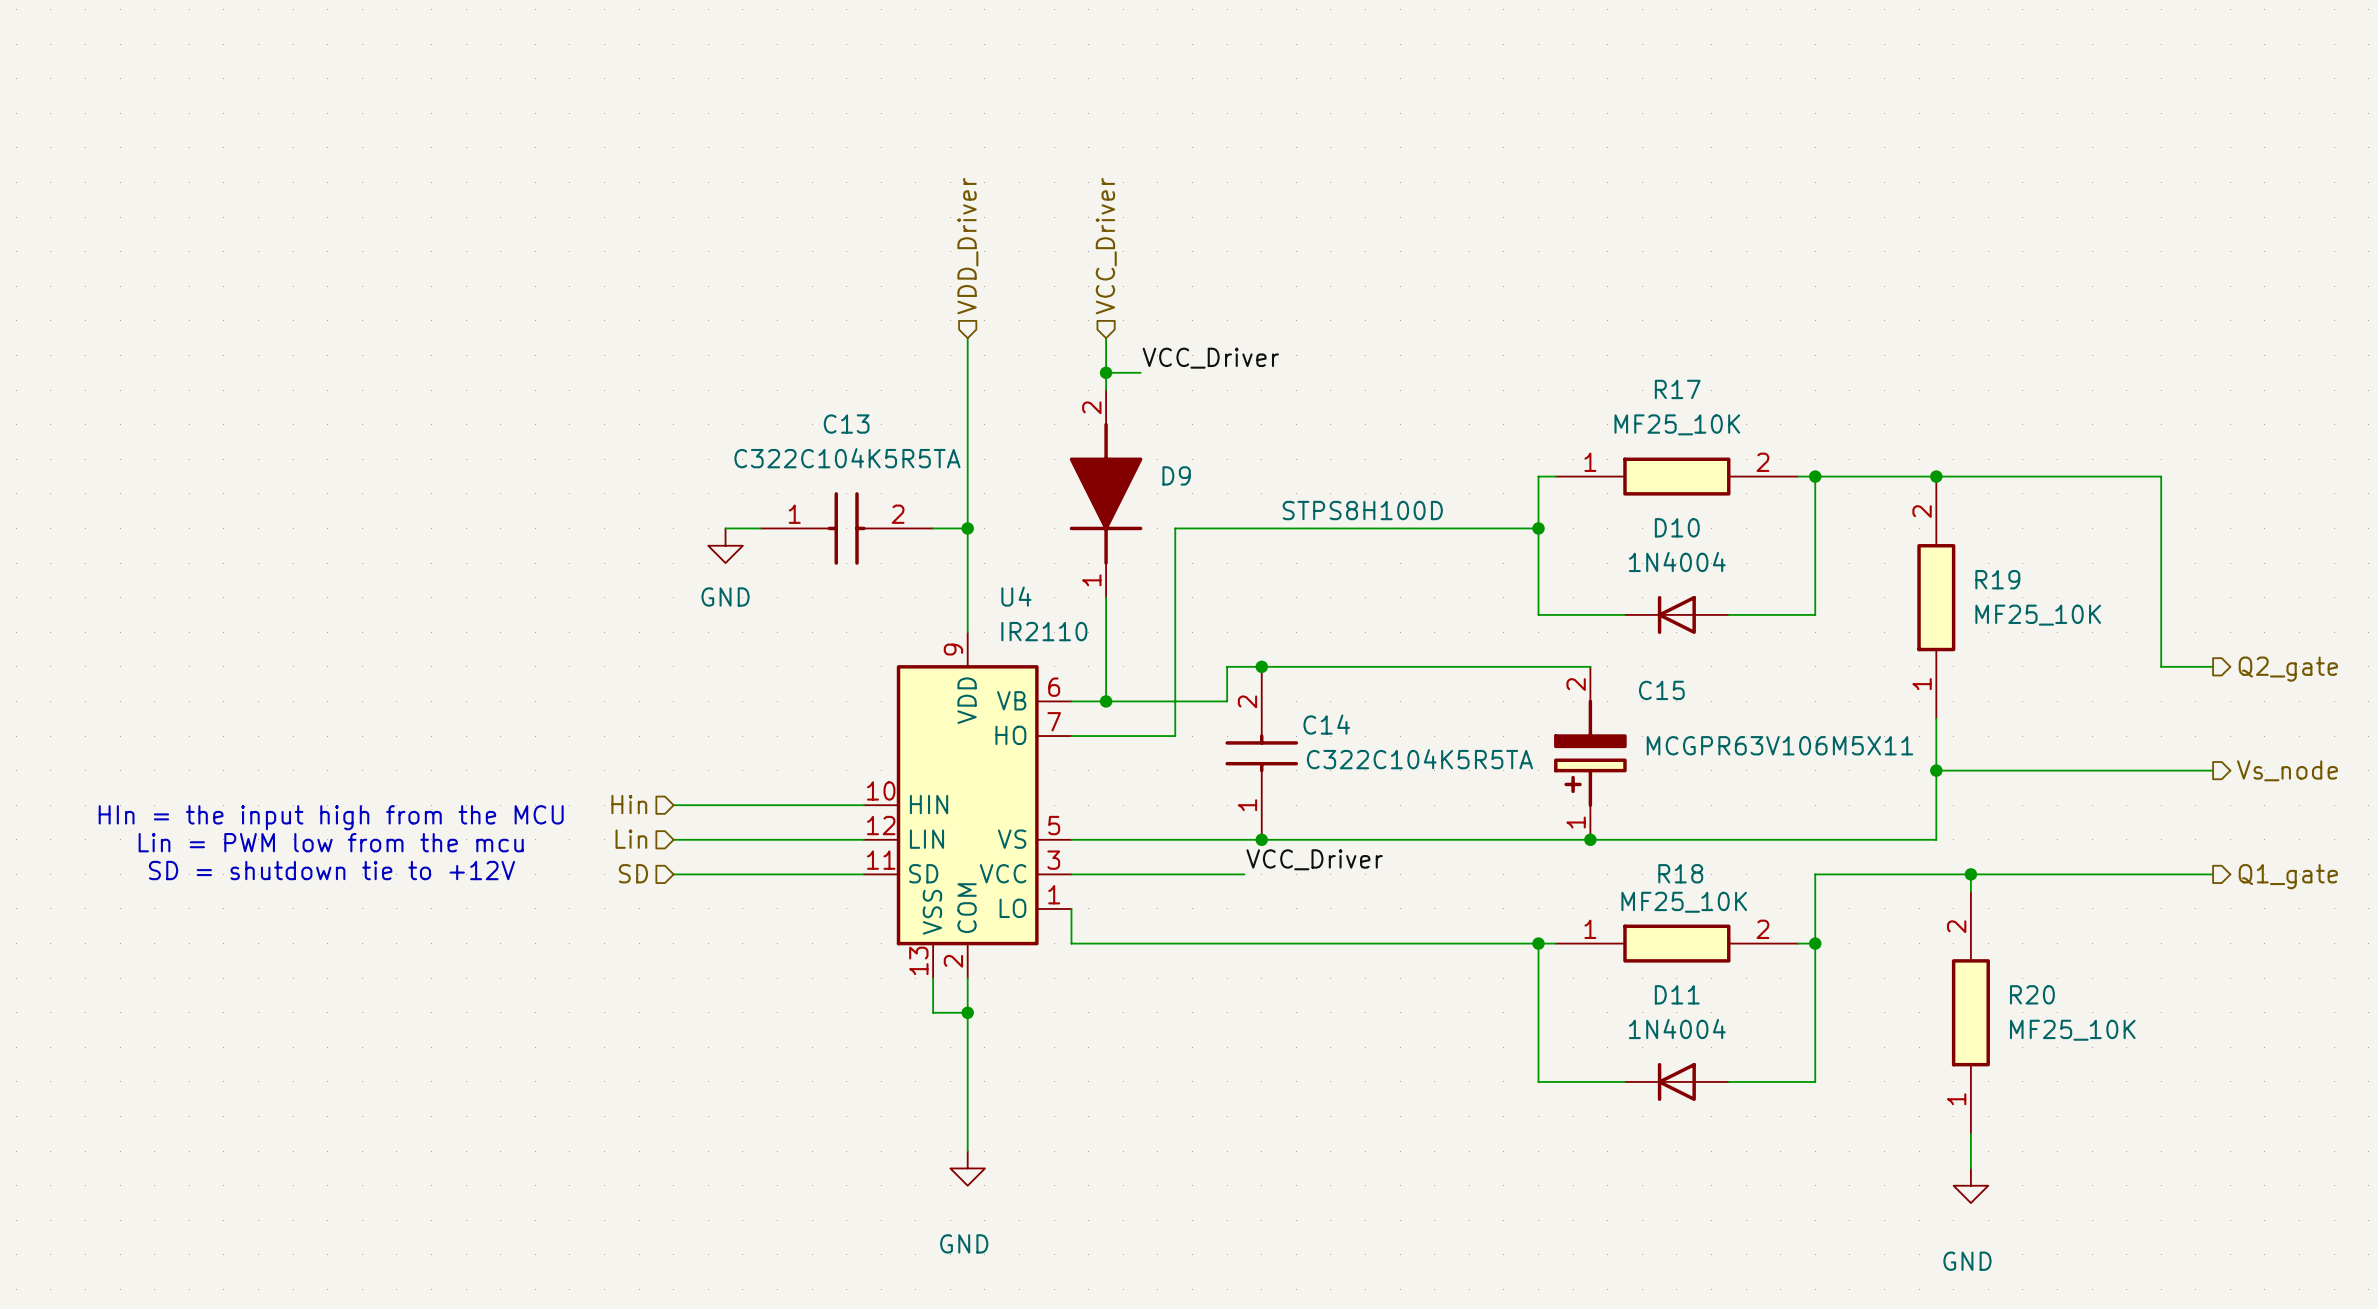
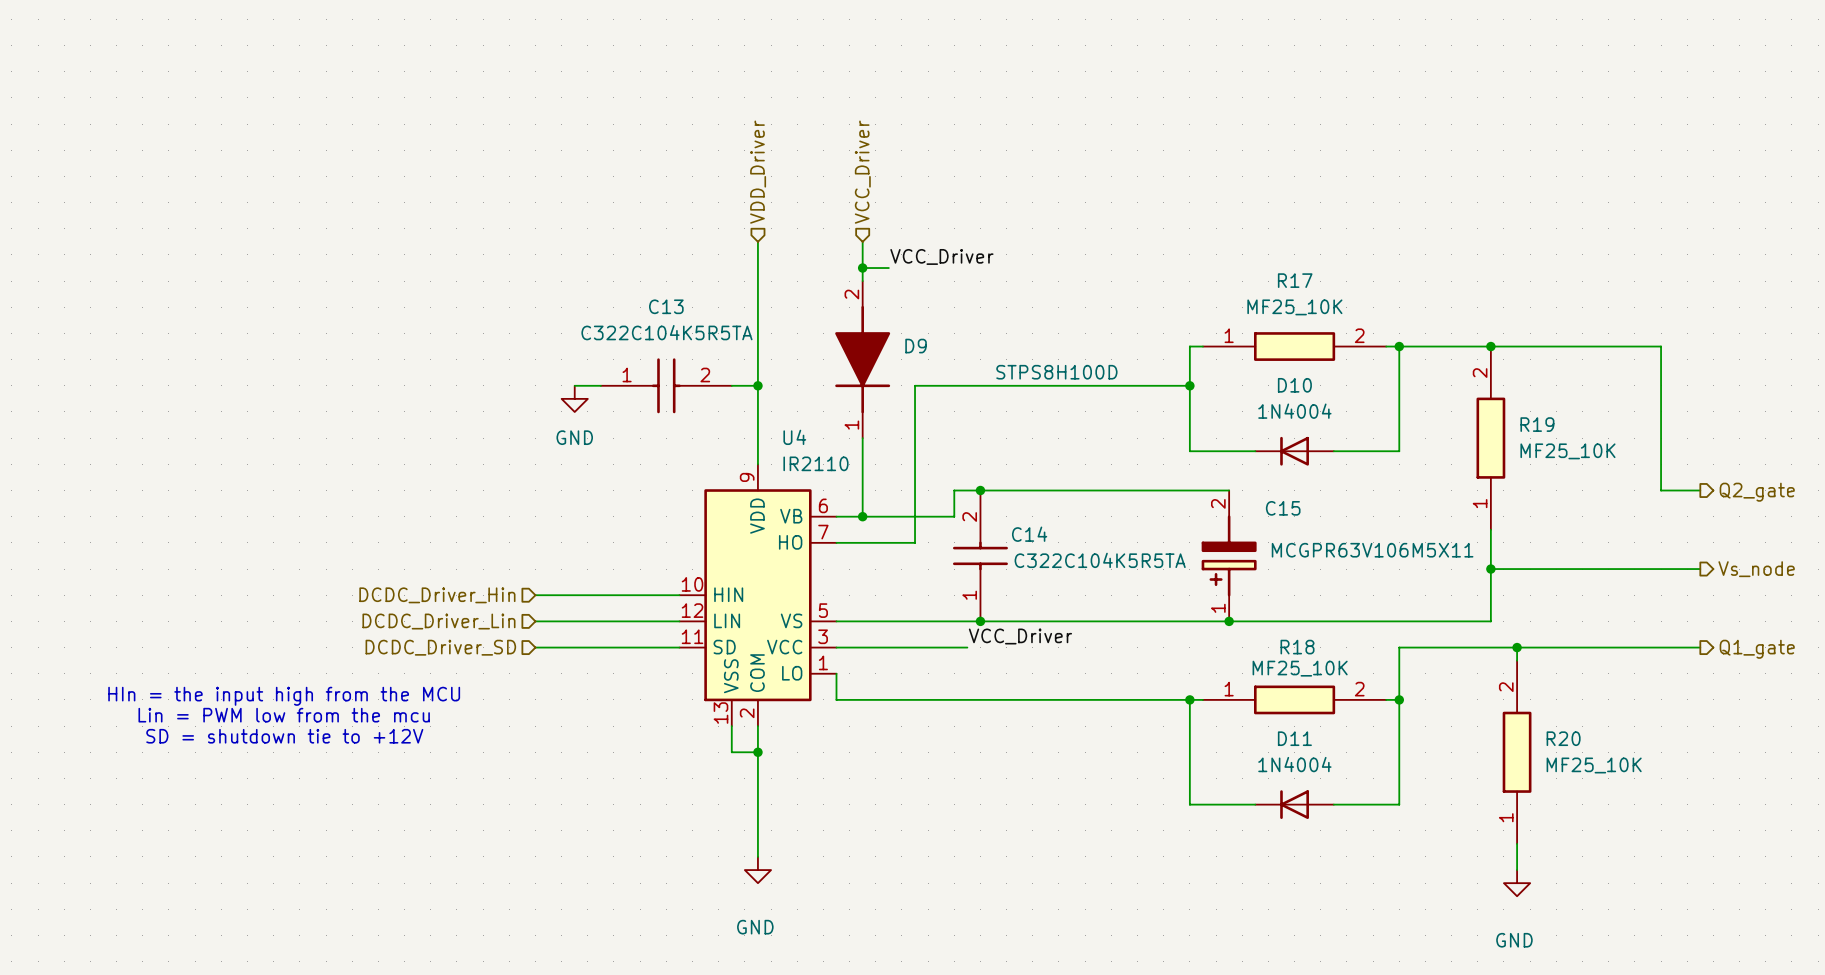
hierarchical label: Hin (629, 804) -> DCDC_Driver_Hin (437, 595)
text position: HIn = the input high from the MCU (331, 817) -> HIn = the input high from the MCU (284, 696)
hierarchical label: Lin (631, 839) -> DCDC_Driver_Lin (438, 621)
text position: Lin = PWM low from the mcu (331, 842) -> Lin = PWM low from the mcu (284, 715)
text position: SD = shutdown tie to +12V (331, 870) -> SD = shutdown tie to +12V (284, 736)
hierarchical label: SD (633, 873) -> DCDC_Driver_SD (440, 647)

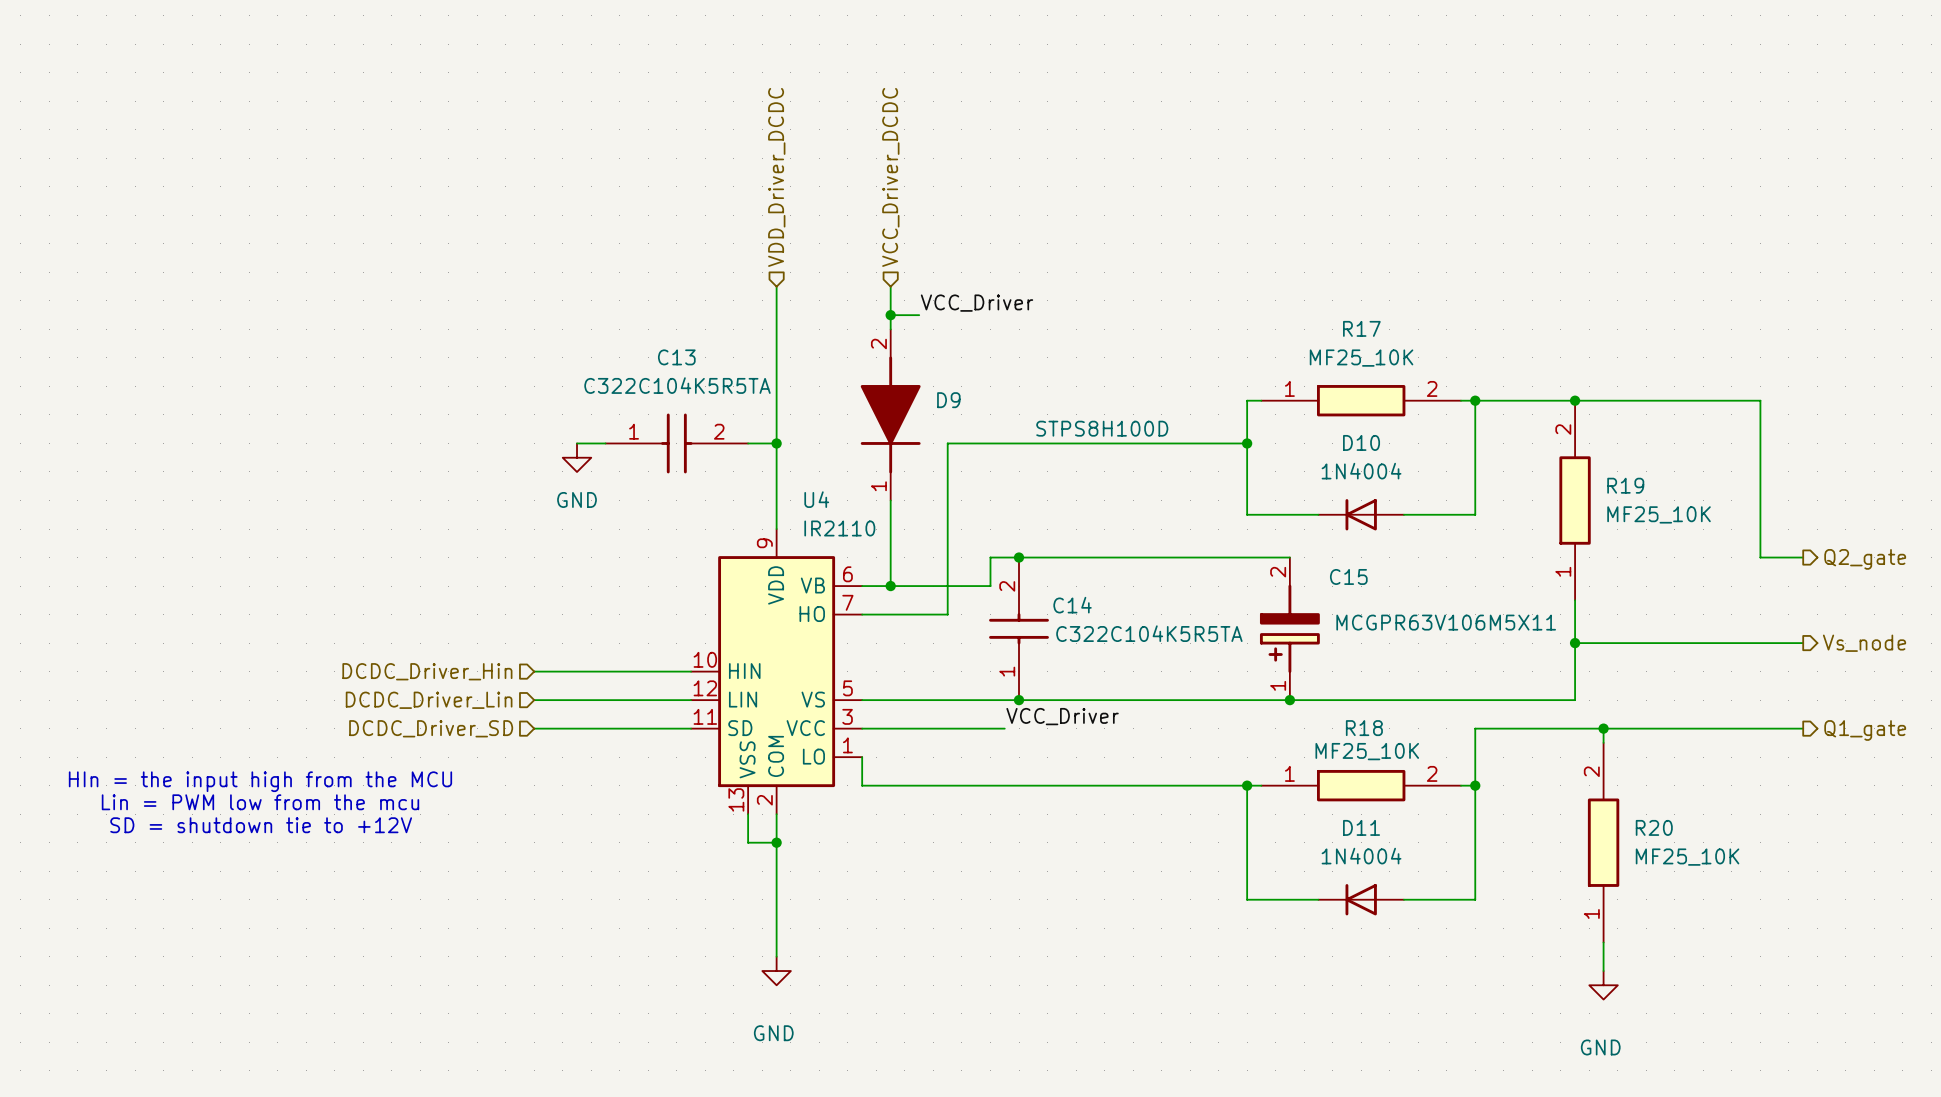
hierarchical label: VDD_Driver (758, 172) -> VDD_Driver_DCDC (776, 177)
hierarchical label: VCC_Driver (862, 172) -> VCC_Driver_DCDC (890, 177)

